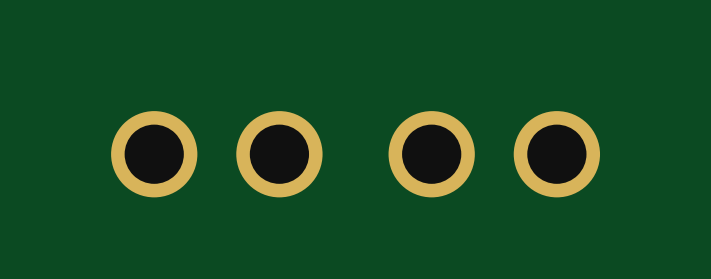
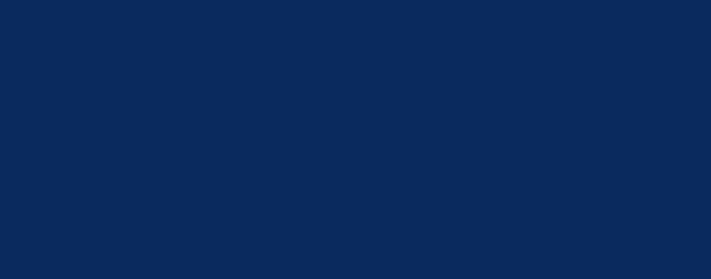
part: (355, 154) -> none

